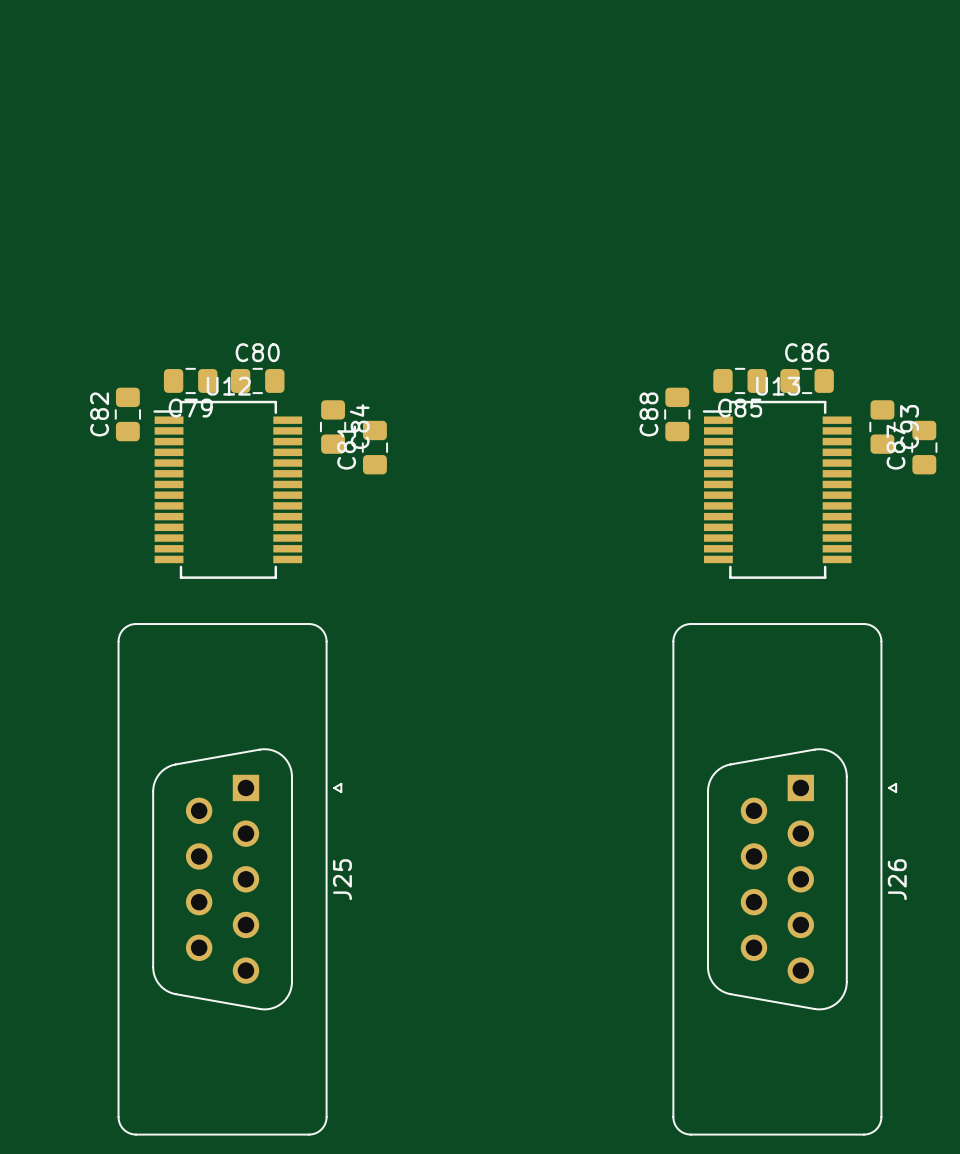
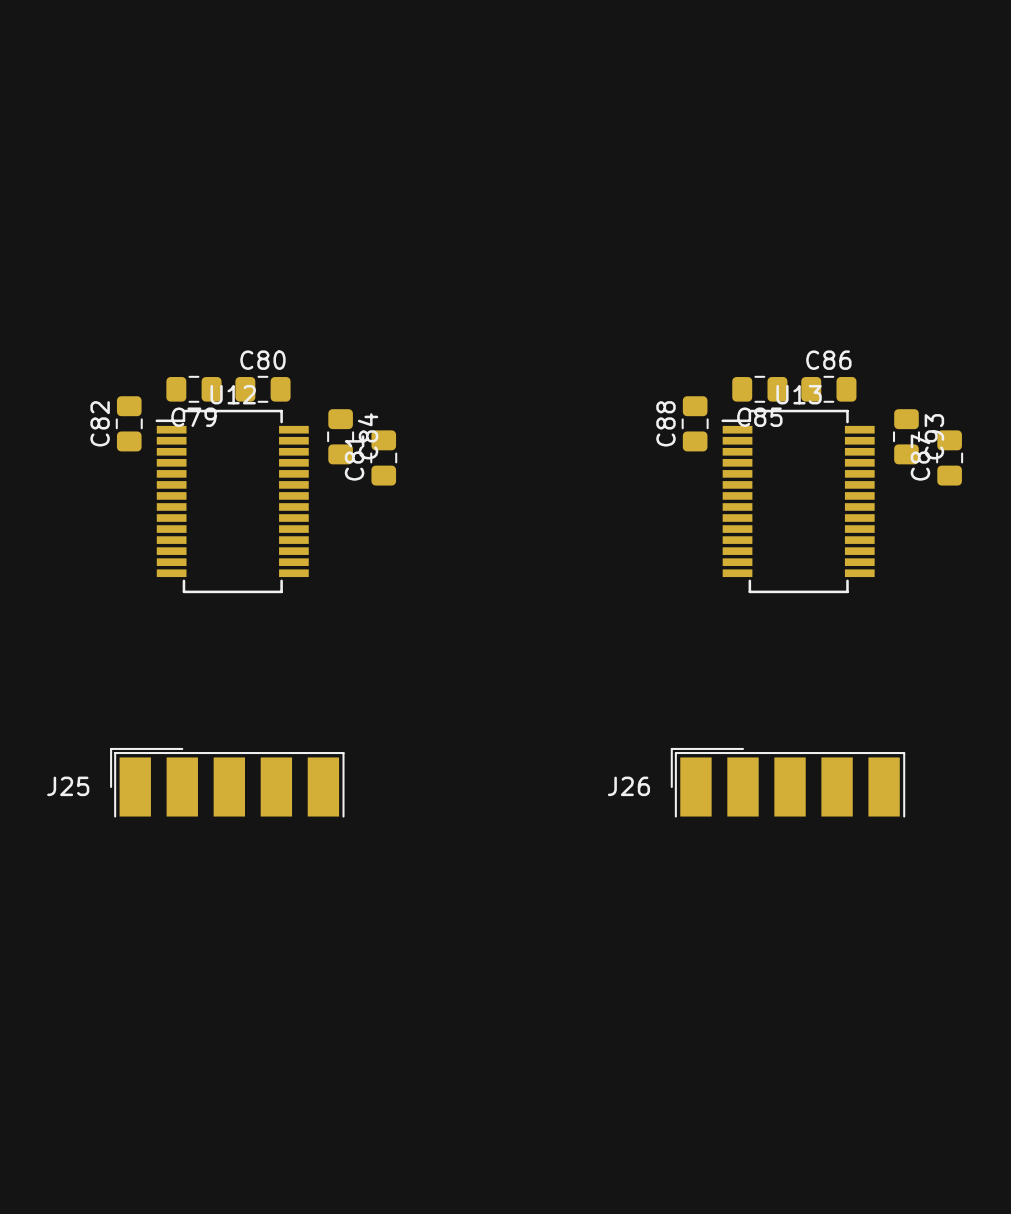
J25 footprint: [117, 623, 343, 1136] -> [110, 747, 345, 818]
J26 footprint: [672, 623, 898, 1136] -> [670, 747, 906, 818]
J25 name position: J25 (342, 879) -> J25 (68, 786)
J26 name position: J26 (897, 879) -> J26 (628, 786)

